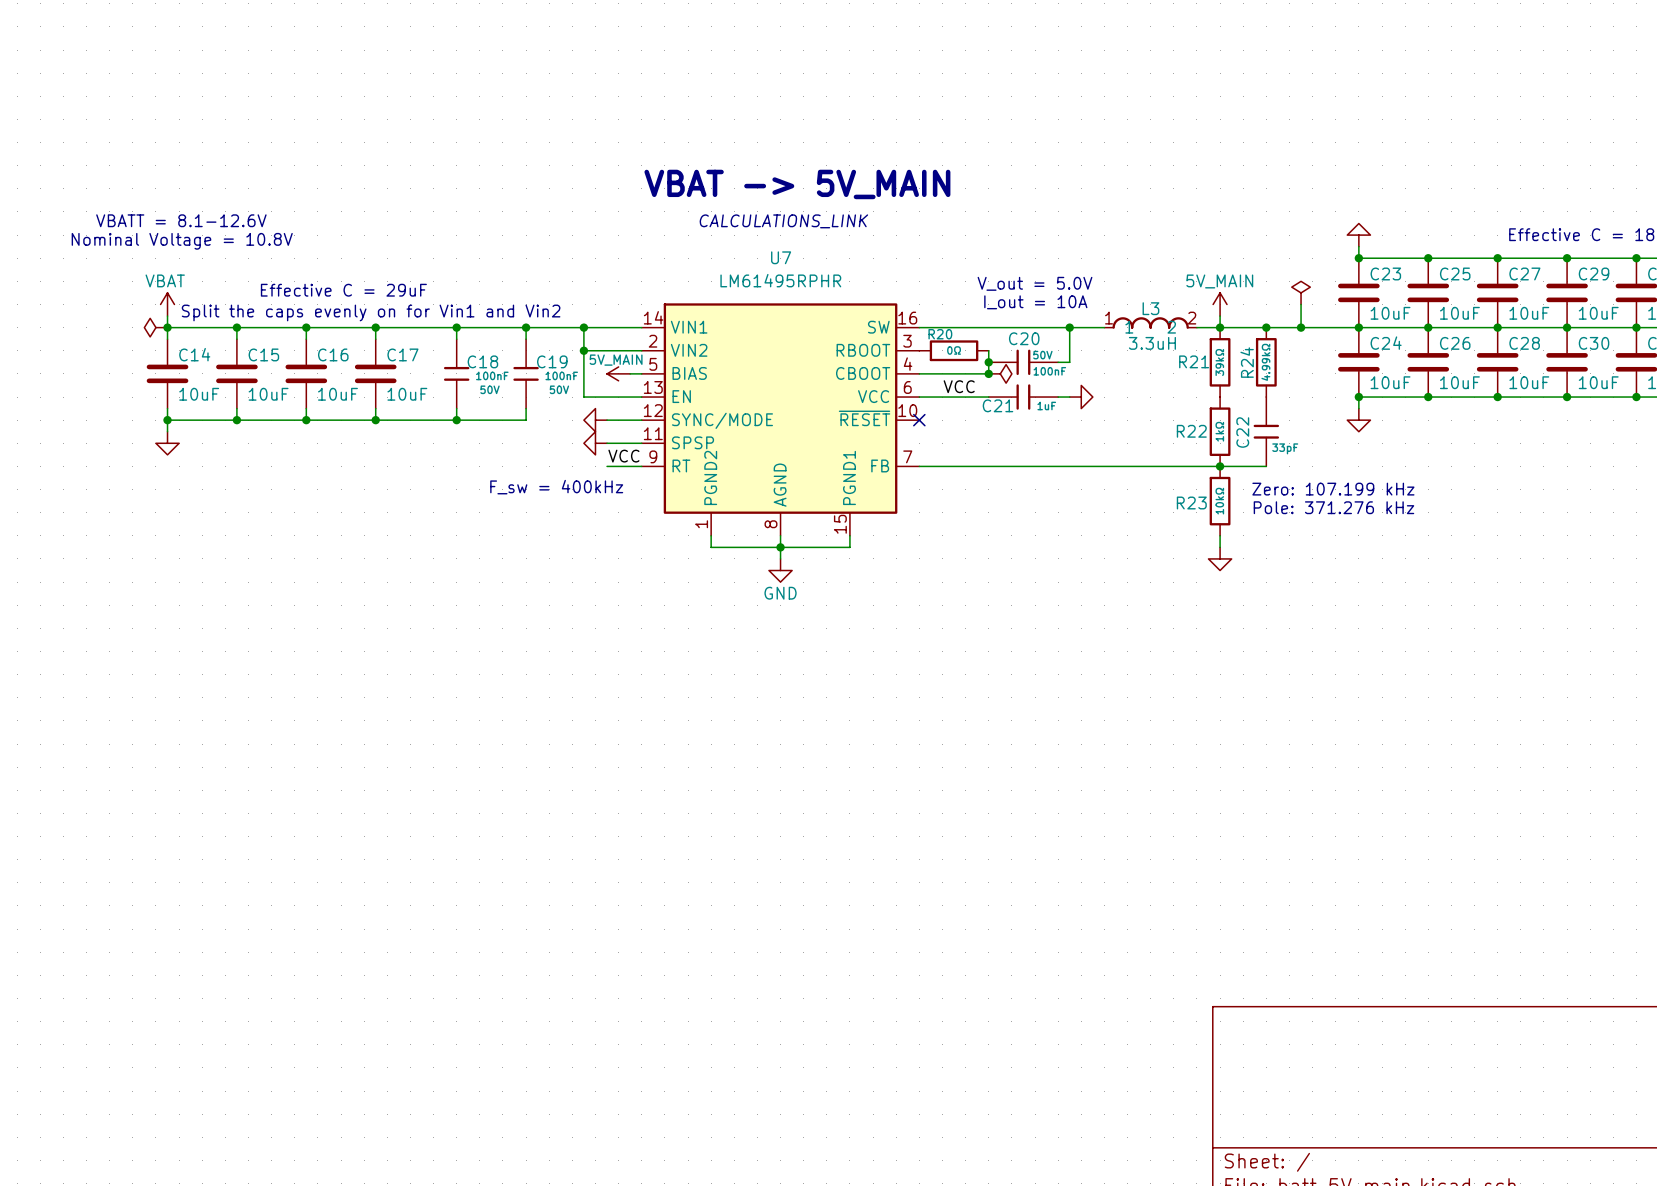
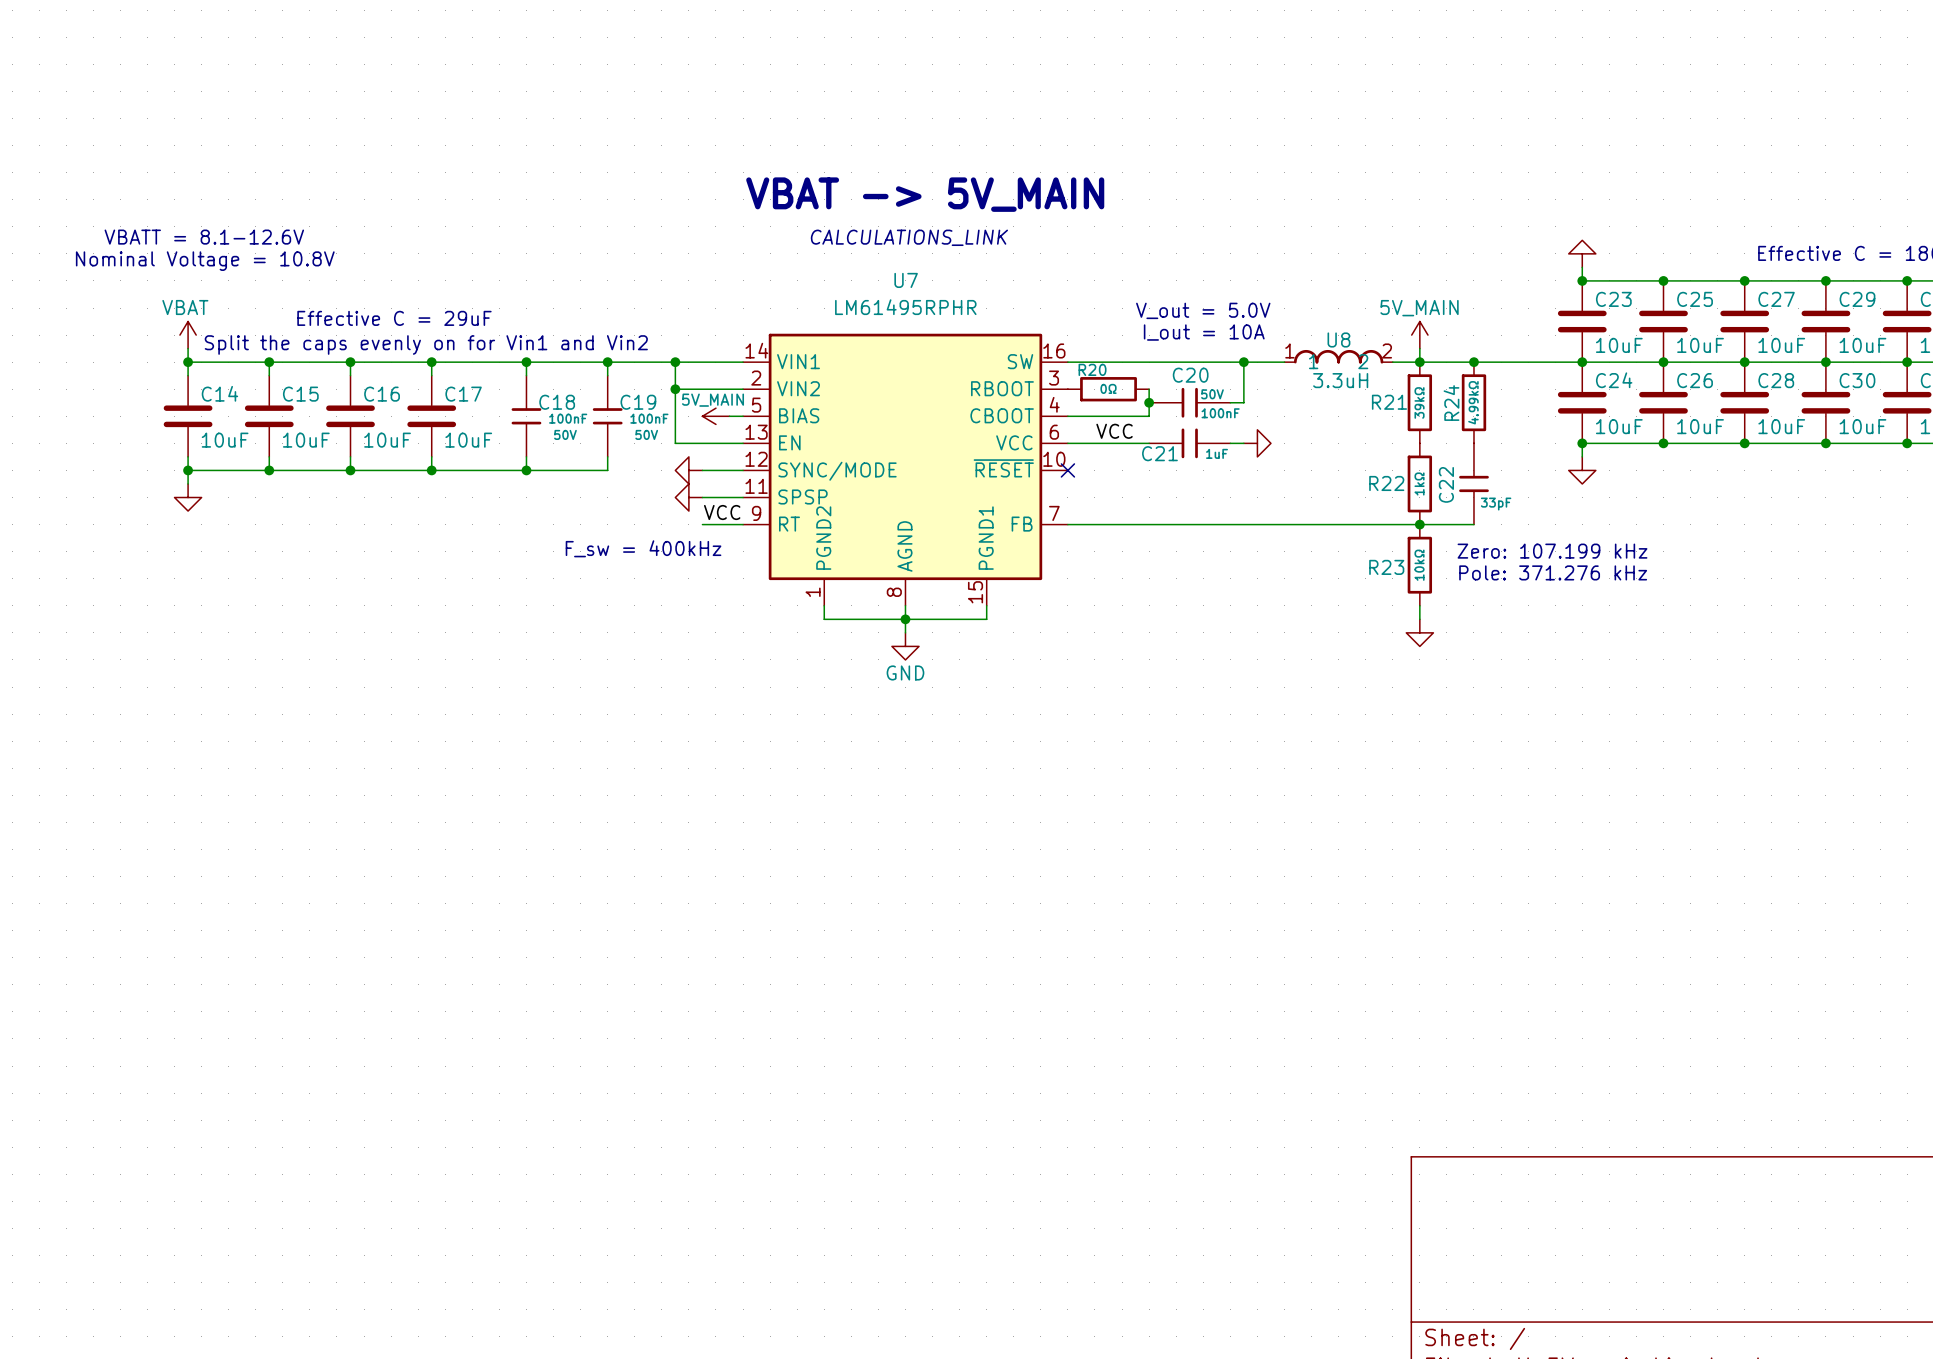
power symbol: (1301, 292) -> none
wire: (1301, 304) (1301, 327) -> none
L3 name: L3 (1150, 308) -> U8 (1338, 339)
power symbol: (155, 327) -> none
junction: (1301, 327) -> none
junction: (988, 373) -> none
power symbol: (1000, 373) -> none

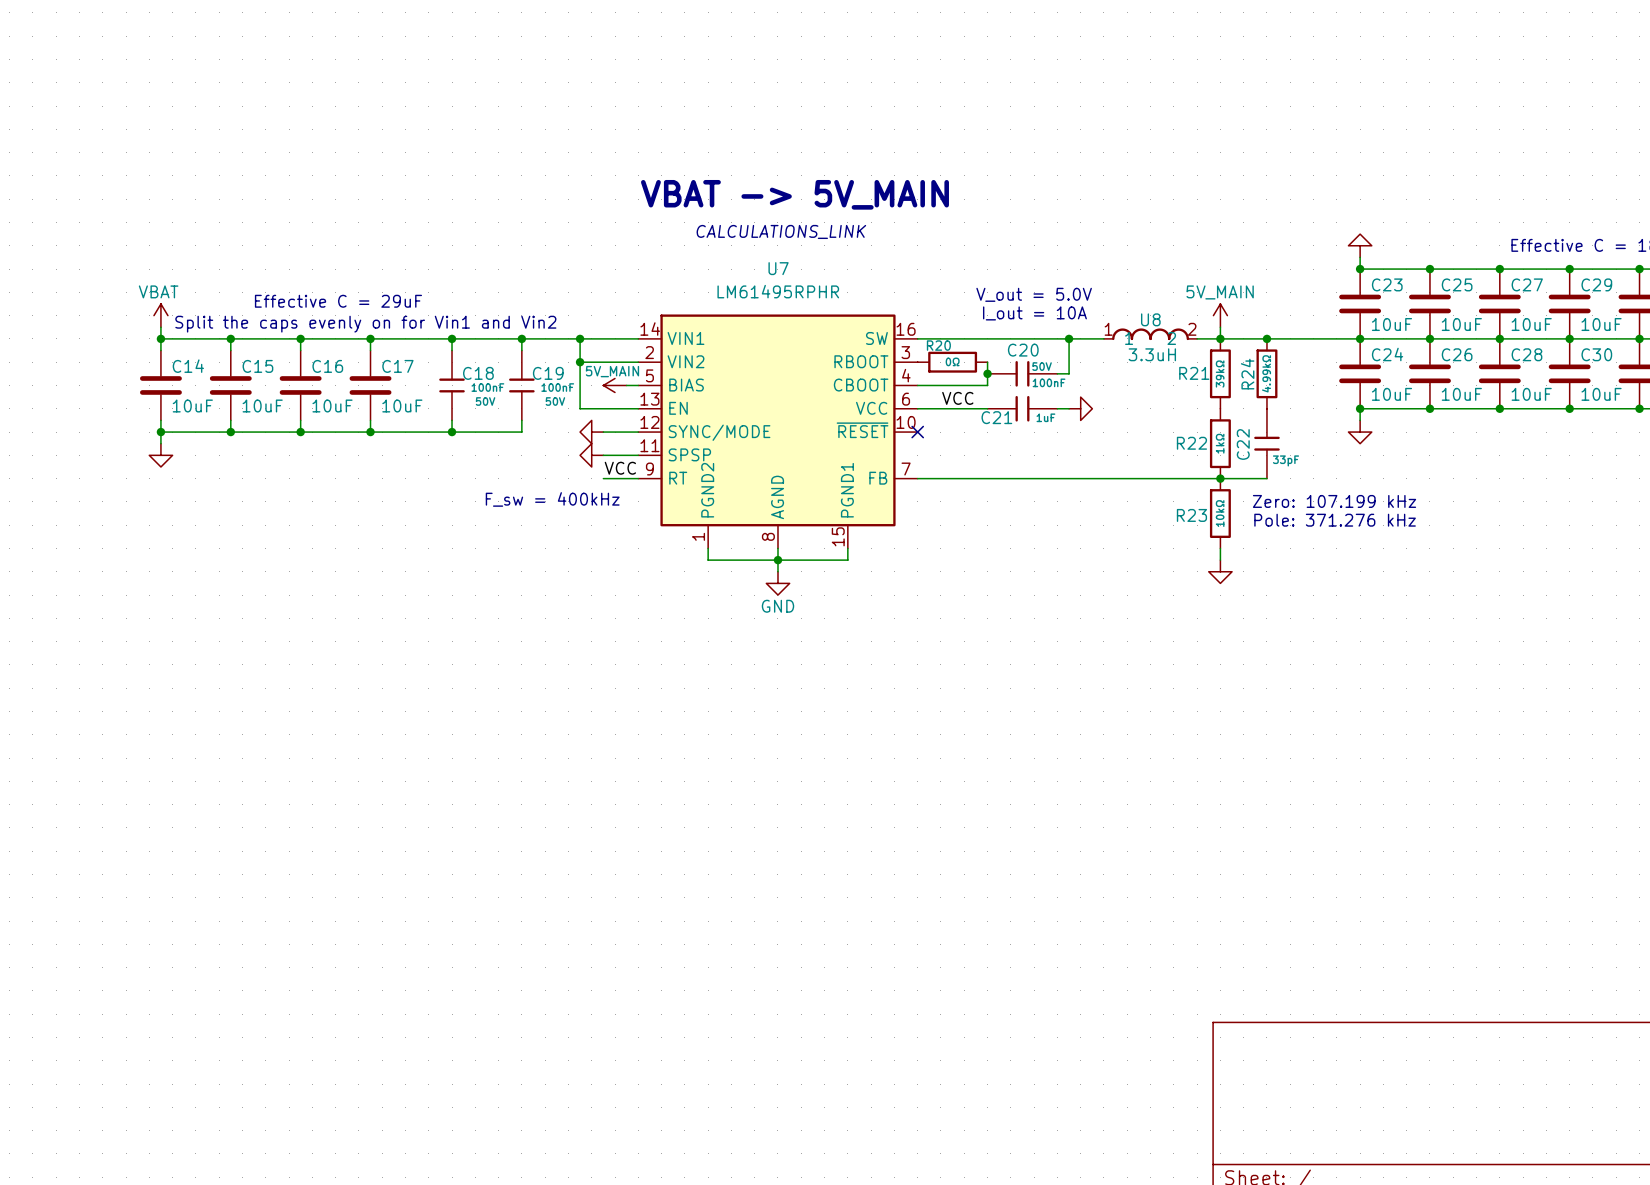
text: VBATT = 8.1-12.6V (204, 237) -> none
text: Nominal Voltage = 10.8V (205, 261) -> none

